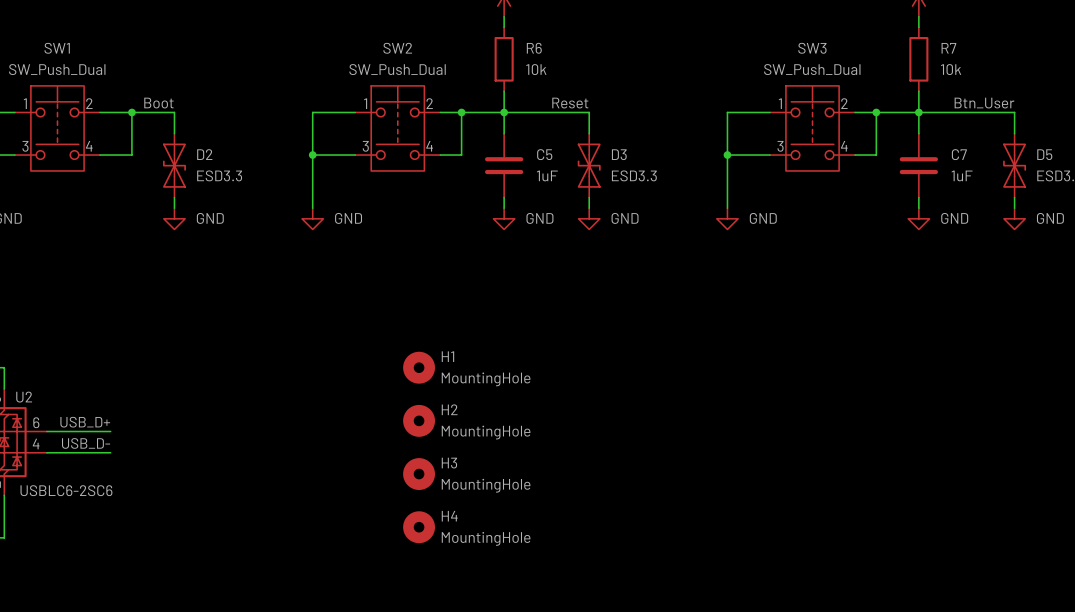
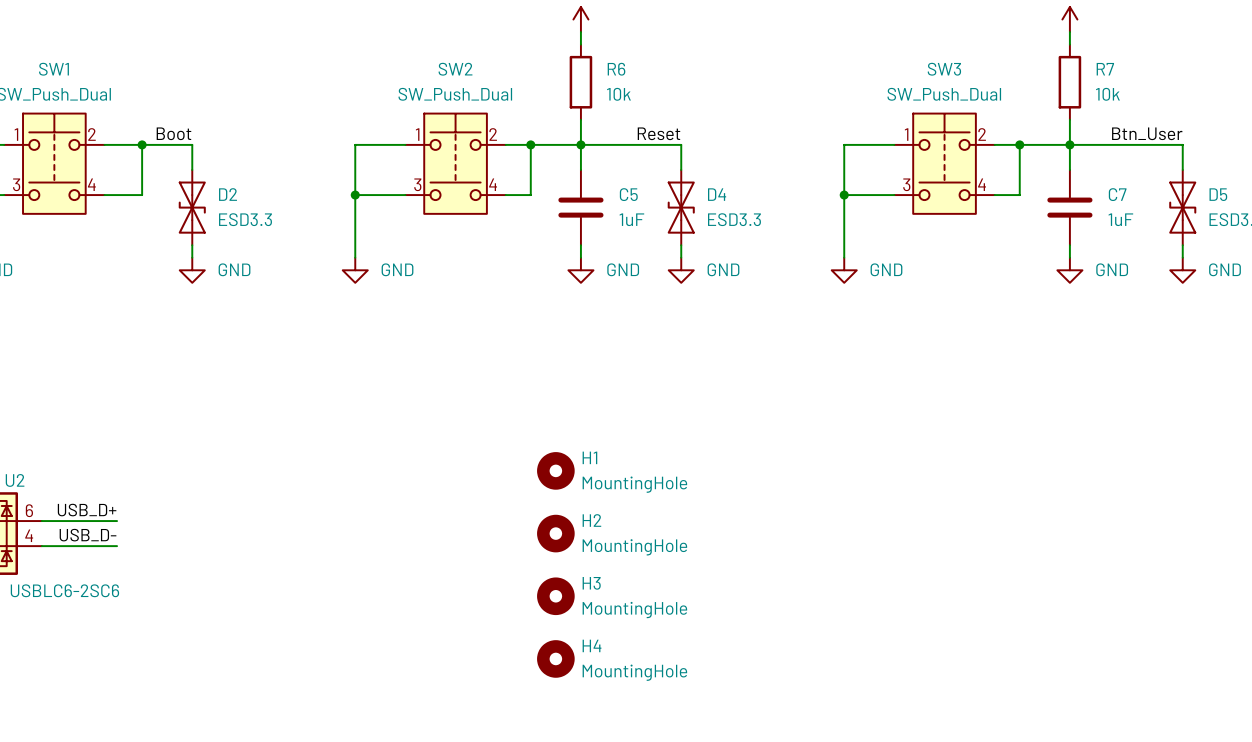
D3 name: D3 (619, 154) -> D4 (717, 194)
H1 position: (419, 367) -> (555, 470)
H2 position: (419, 420) -> (555, 533)
H3 position: (419, 474) -> (555, 596)
H4 position: (419, 527) -> (555, 658)

